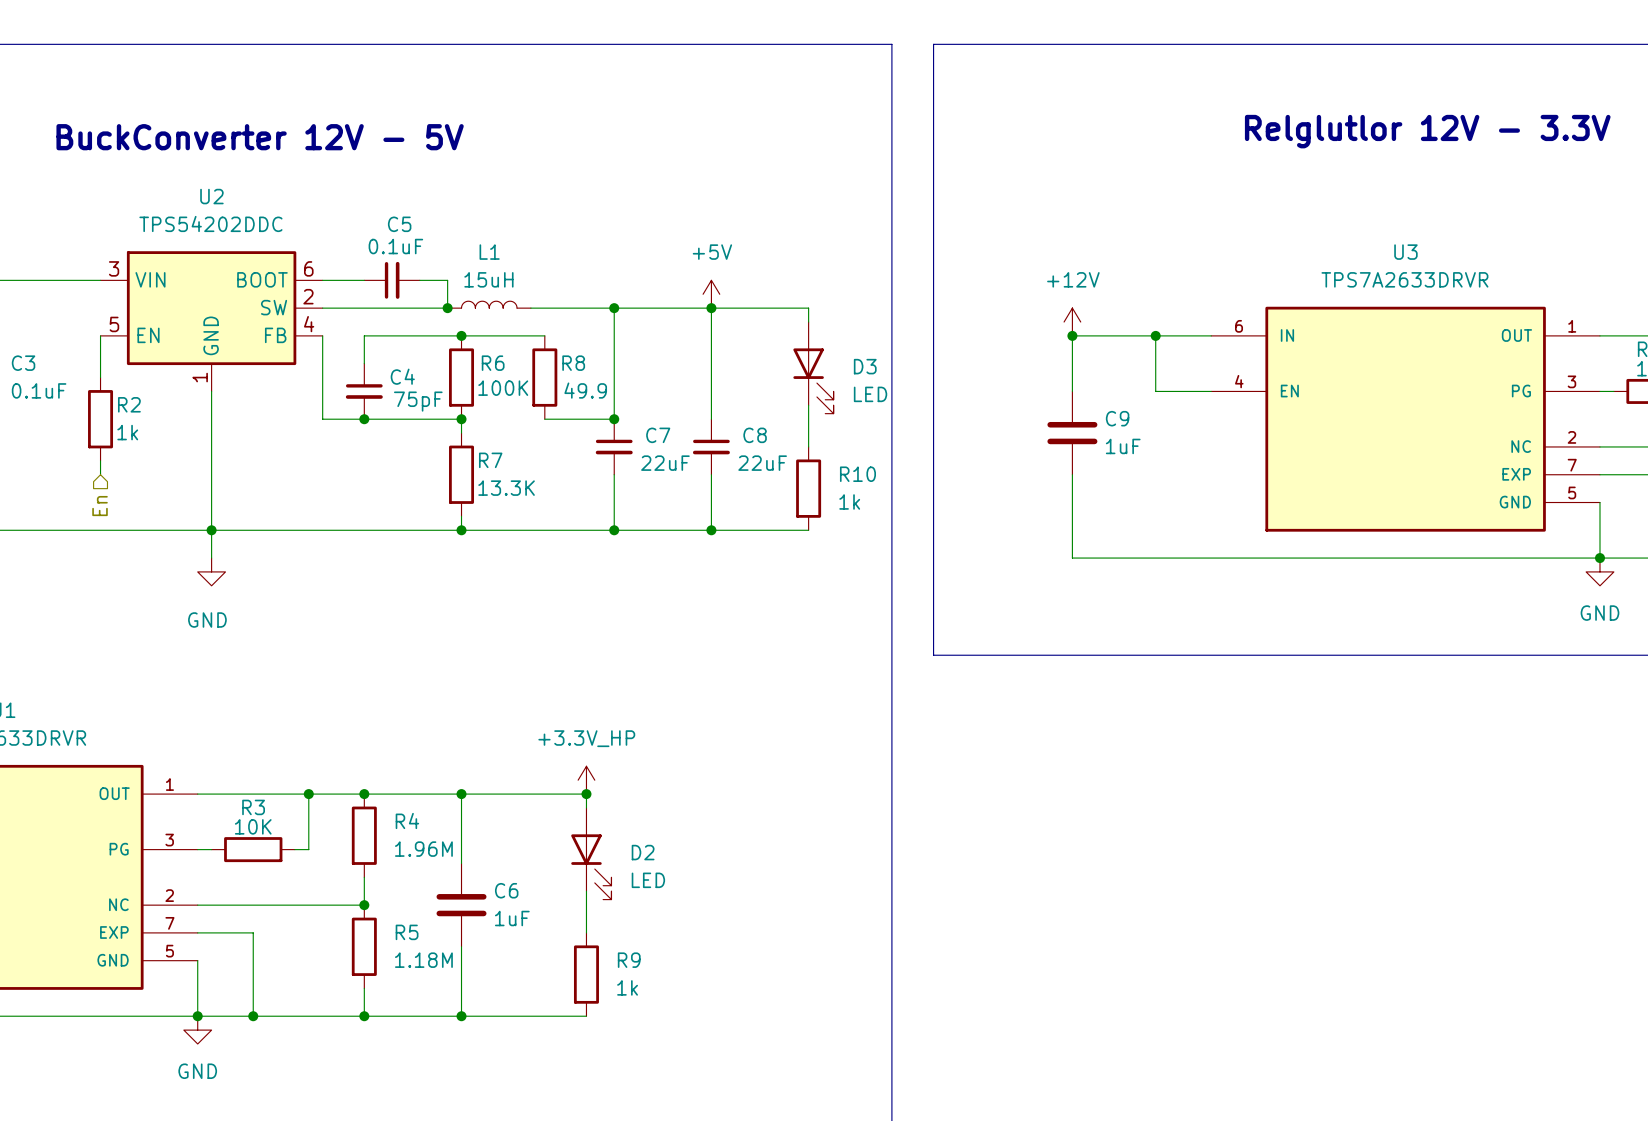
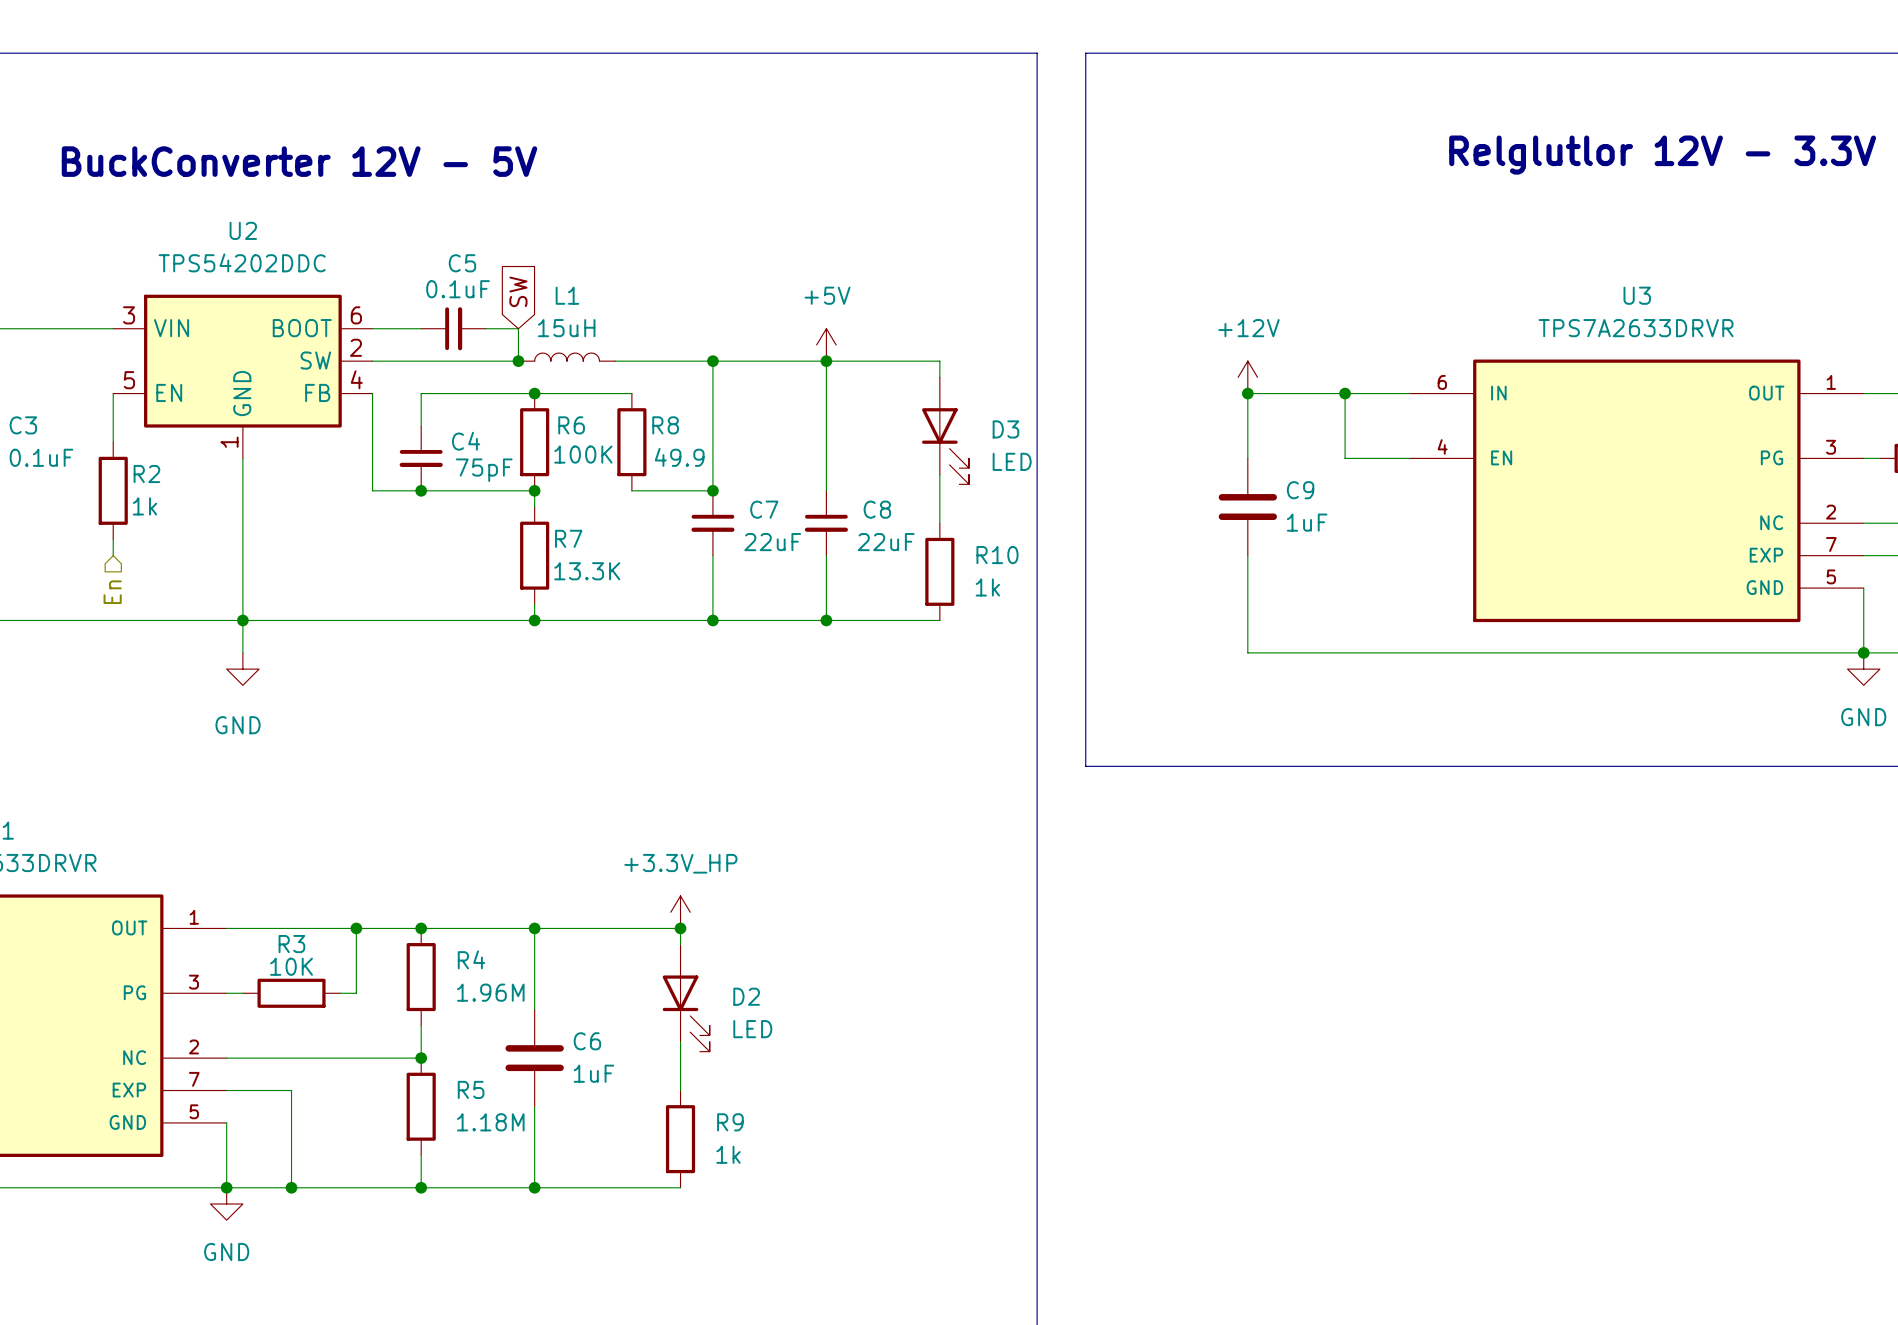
global label: none -> SW (518, 291)

